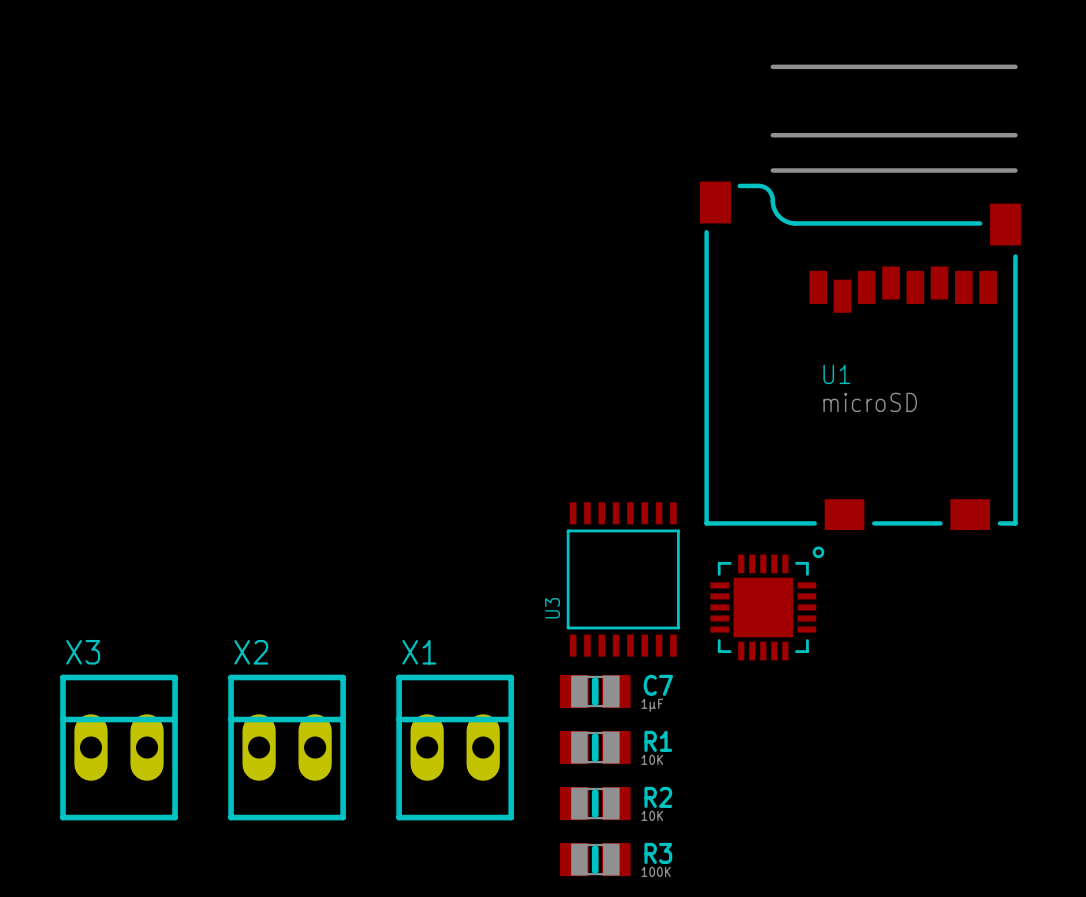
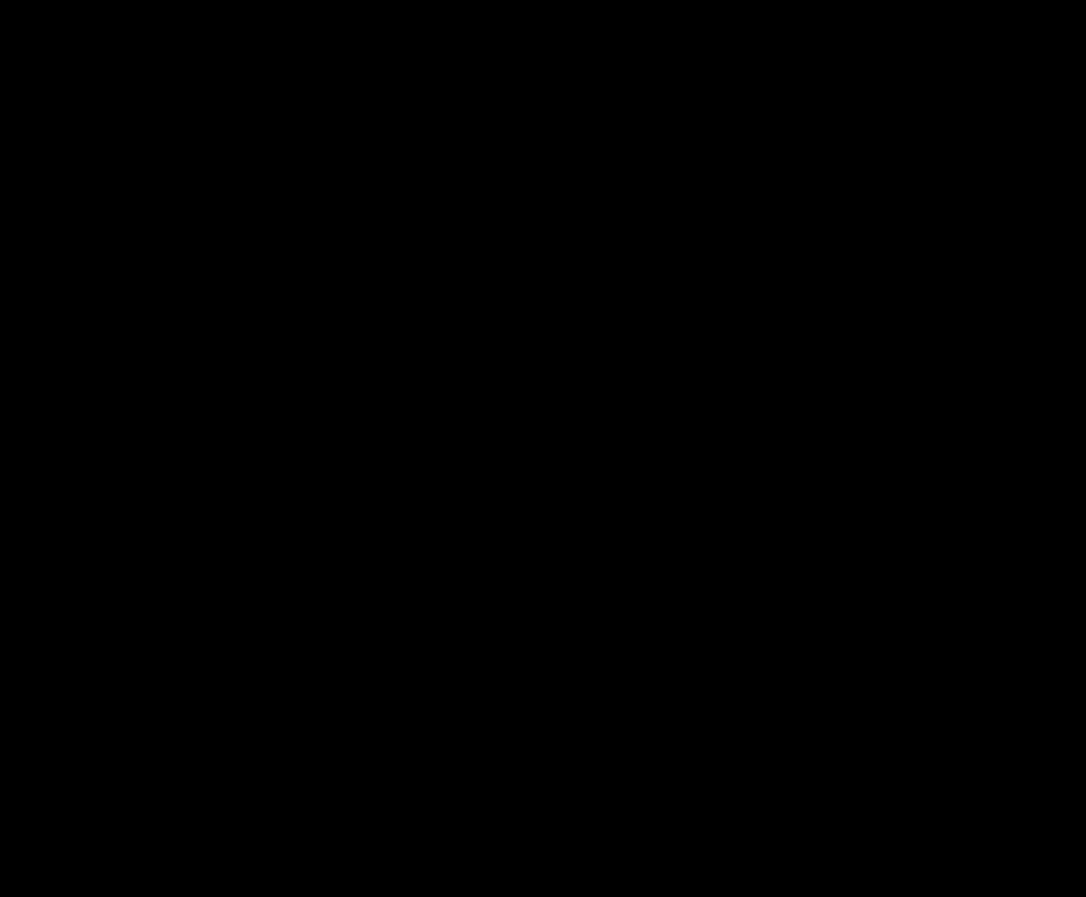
U1: microSD (860, 297) -> none
U3: (623, 579) -> none
part: (767, 603) -> none
C7: 1µF (595, 691) -> none
X3: (119, 747) -> none
X2: (287, 747) -> none
X1: (455, 747) -> none
R1: 10K (595, 747) -> none
R2: 10K (595, 803) -> none
R3: 100K (595, 859) -> none

